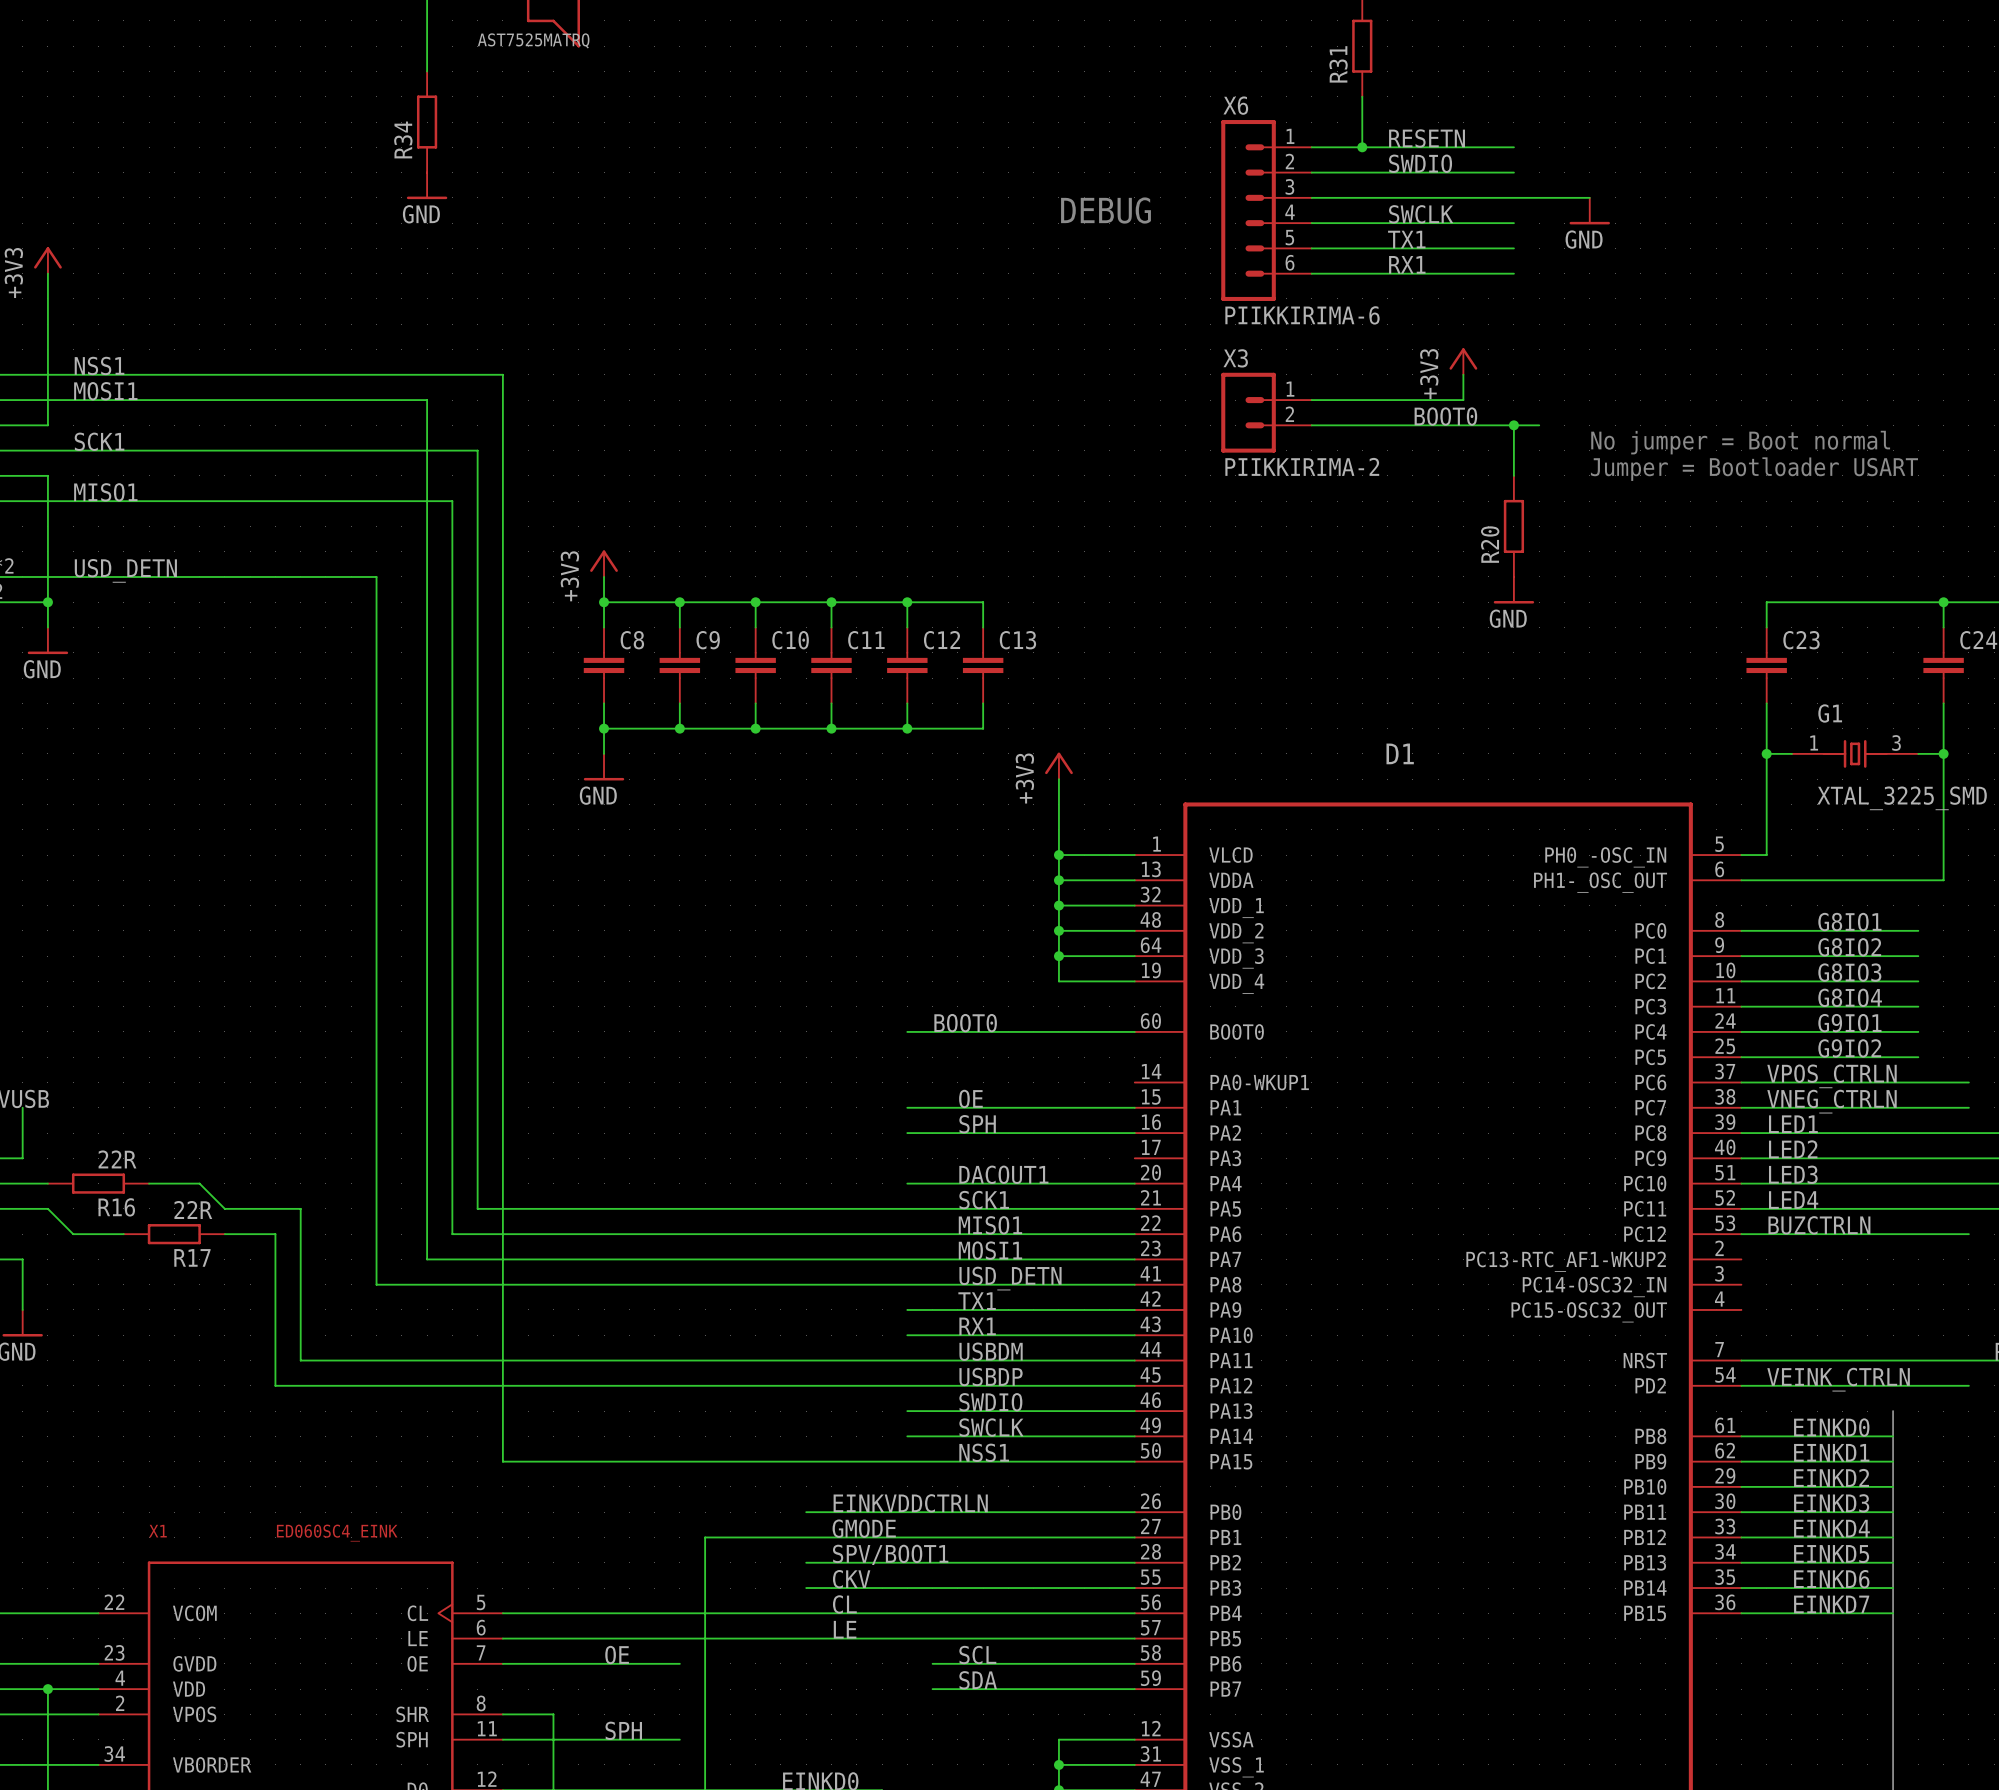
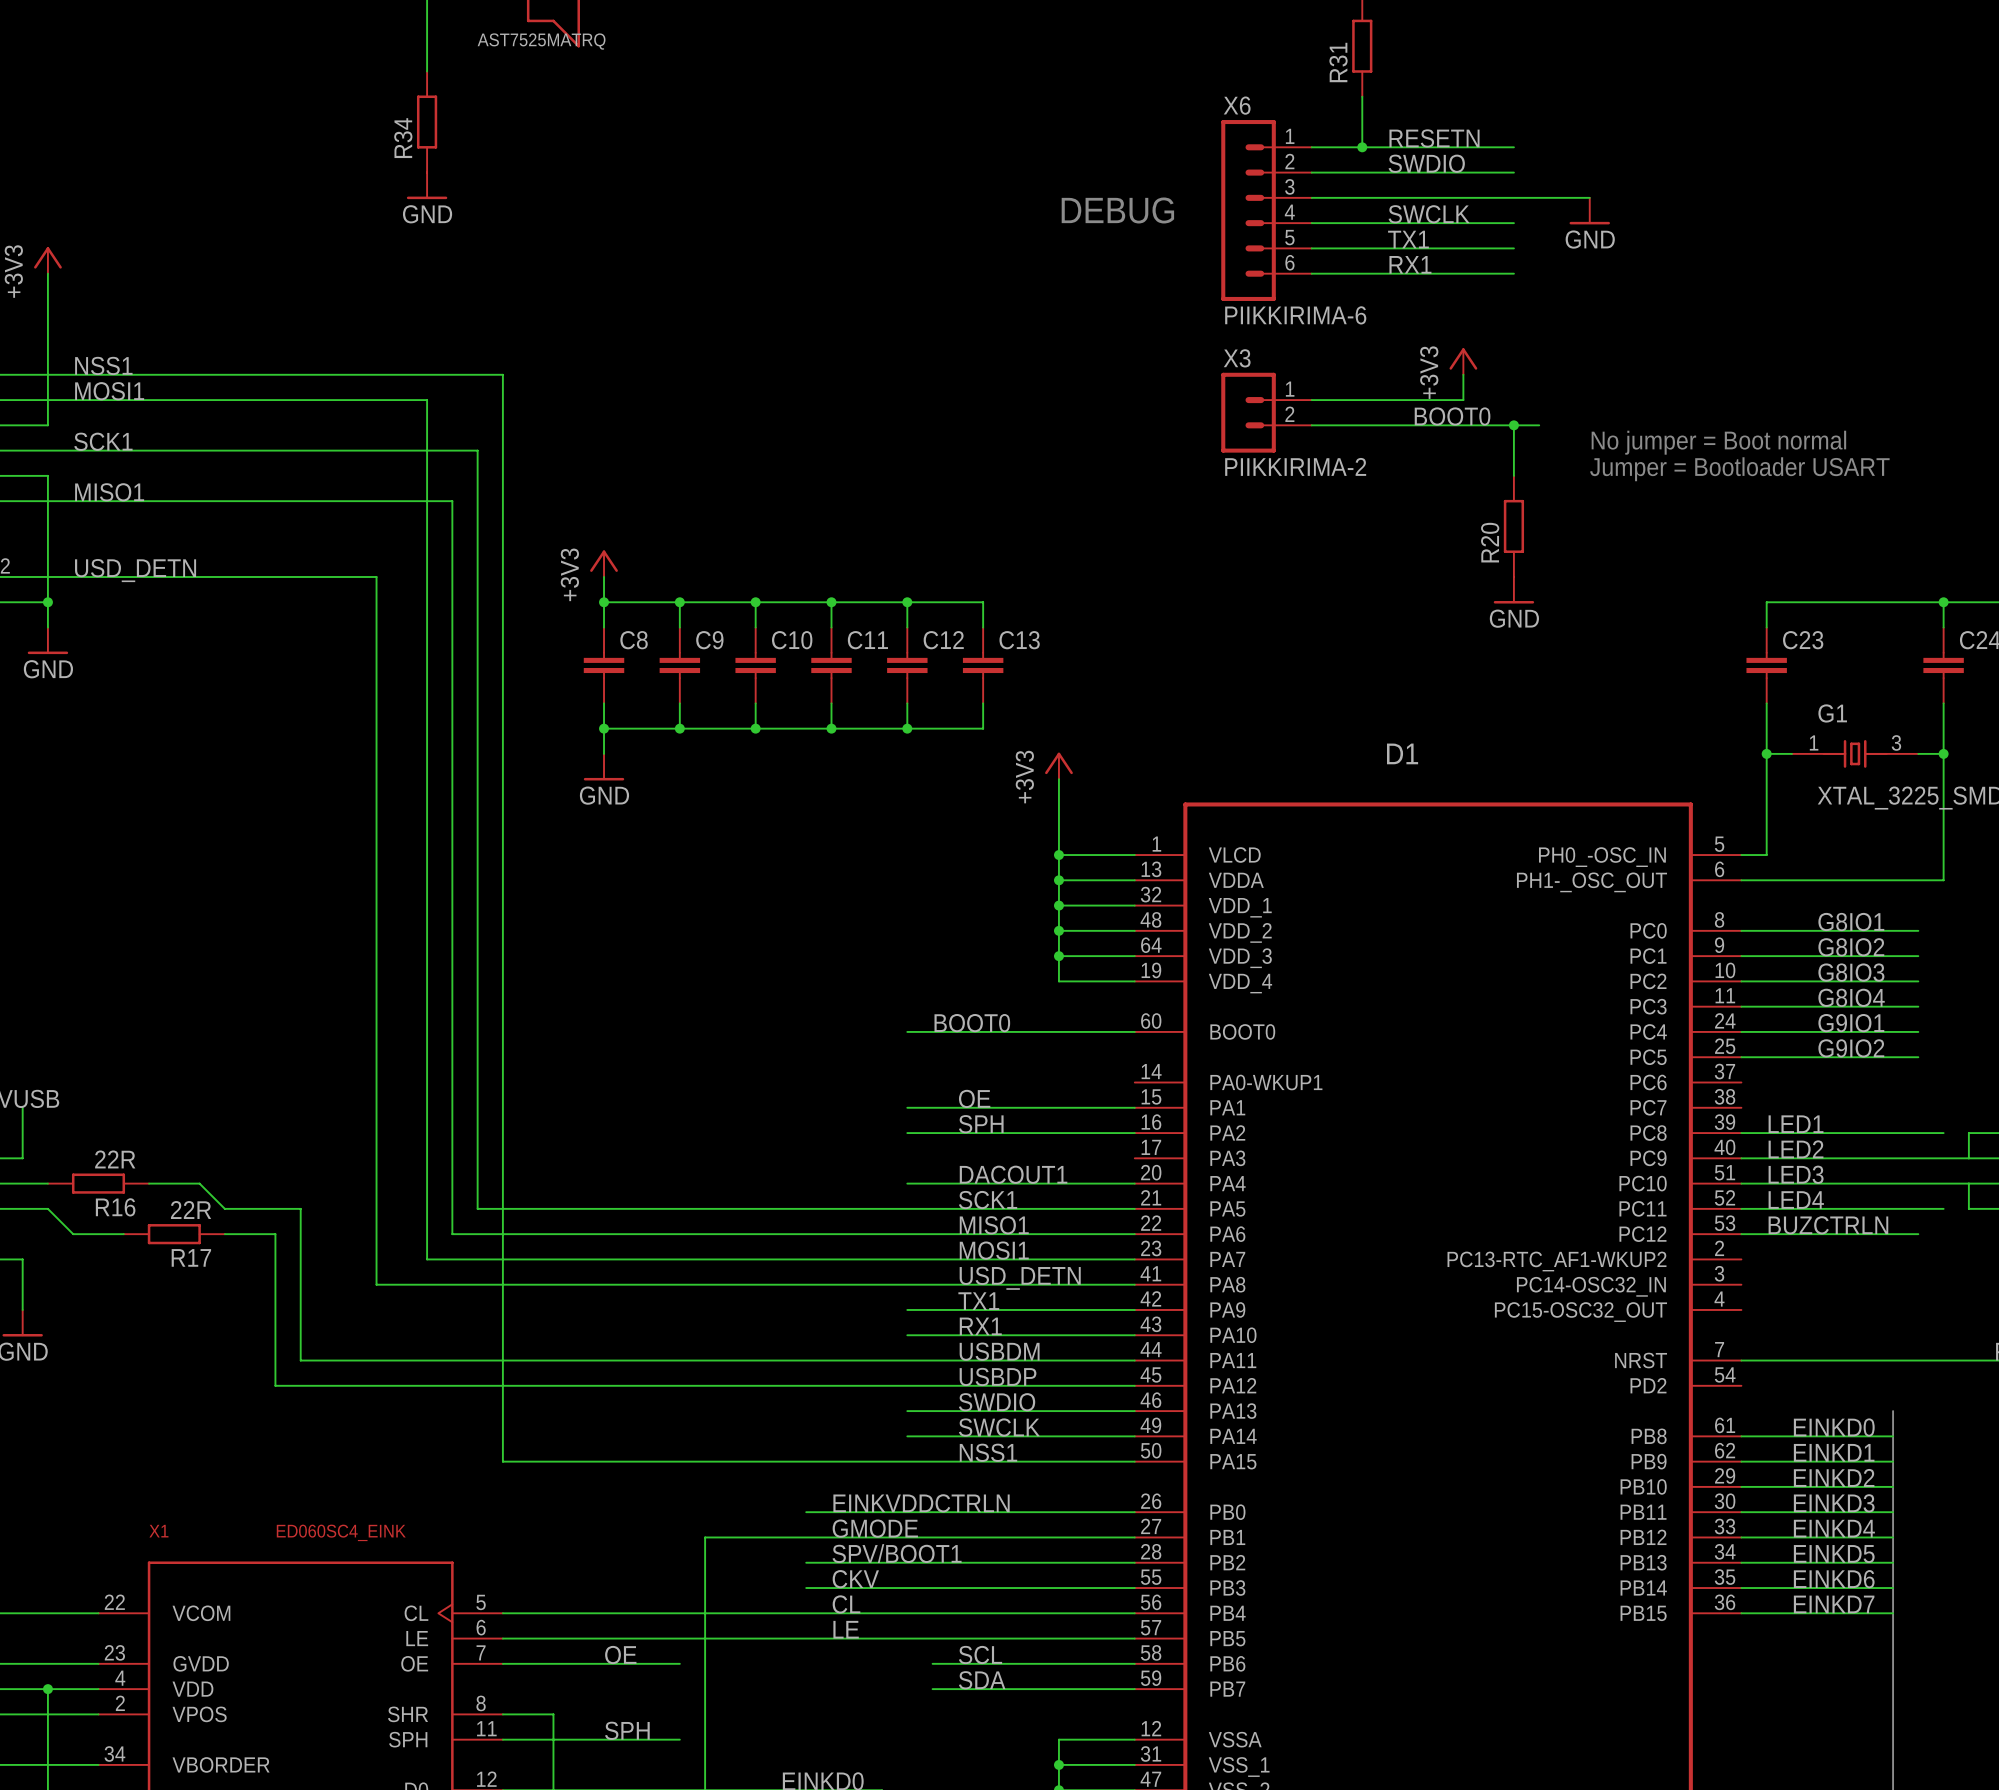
label: VPOS_CTRLN (1832, 1076) -> none
wire: (1741, 1082) (1968, 1082) -> none
label: VNEG_CTRLN (1832, 1101) -> none
wire: (1741, 1107) (1968, 1107) -> none
wire: (1943, 1133) (1968, 1133) -> (1968, 1158) (1968, 1133)
wire: (1943, 1208) (1968, 1208) -> (1968, 1183) (1968, 1208)
wire: (1918, 1234) (1968, 1234) -> none
label: VEINK_CTRLN (1838, 1379) -> none
wire: (1741, 1385) (1968, 1385) -> none

